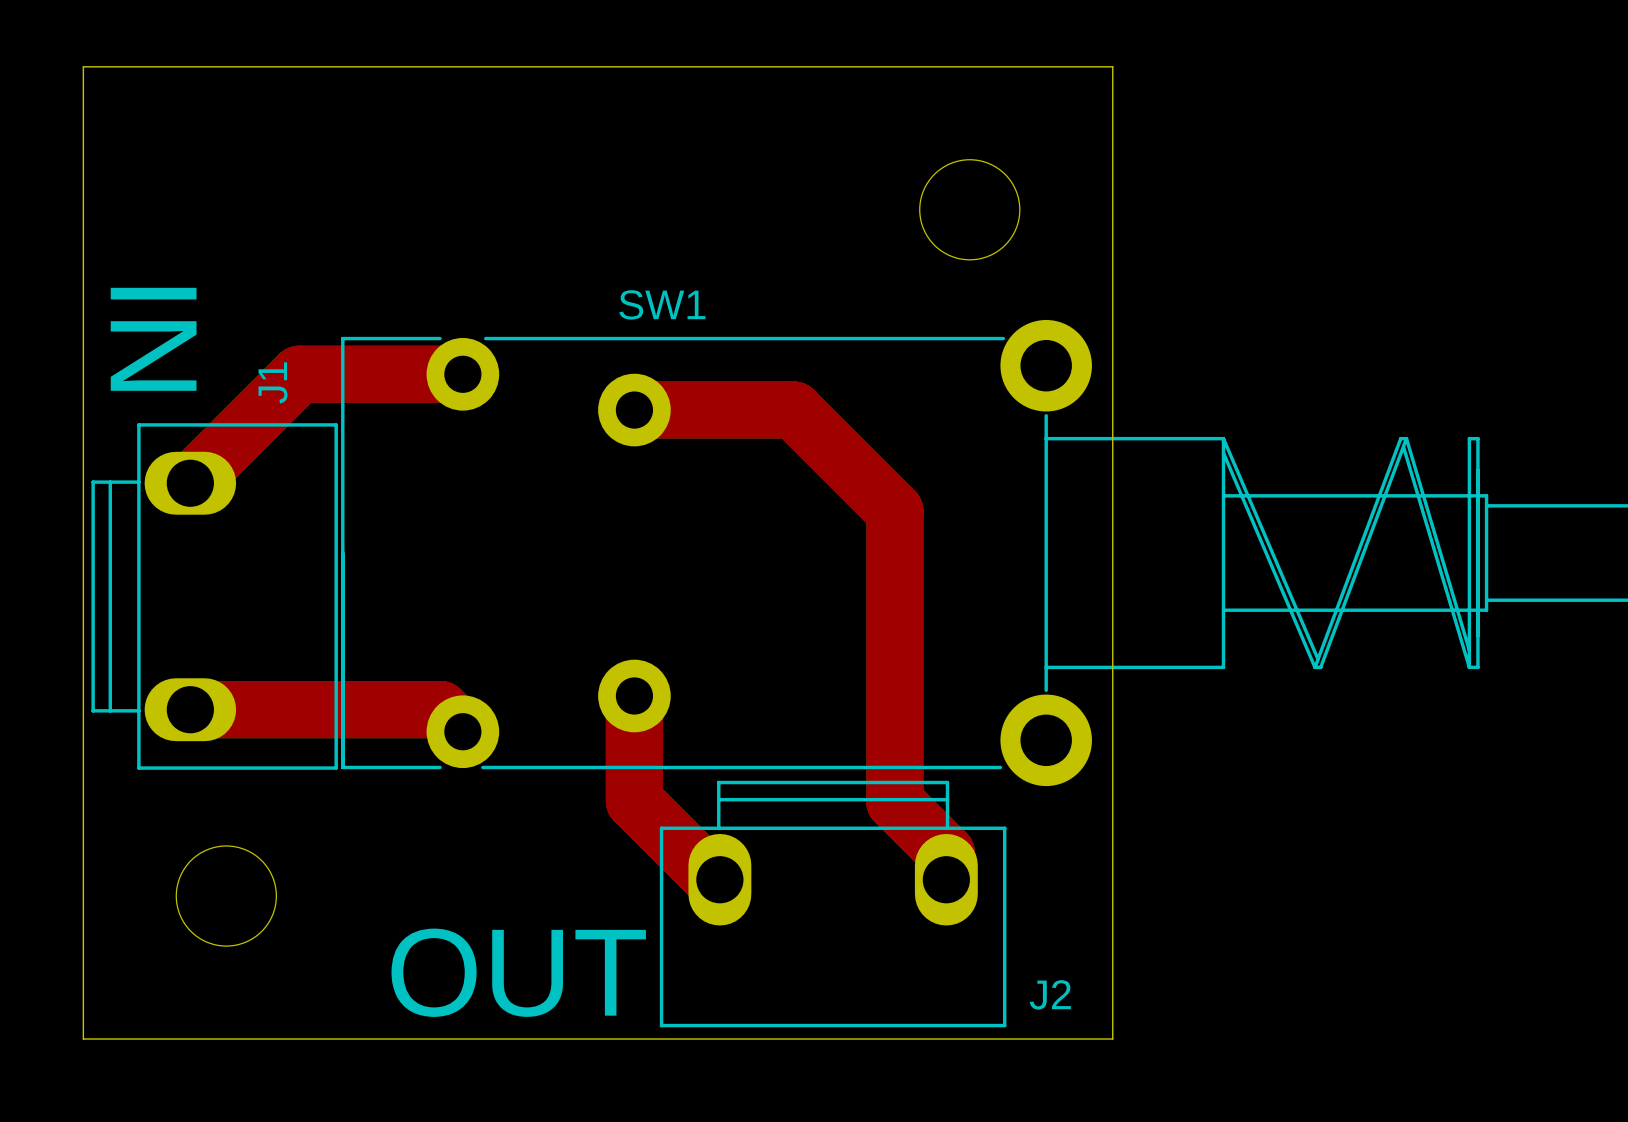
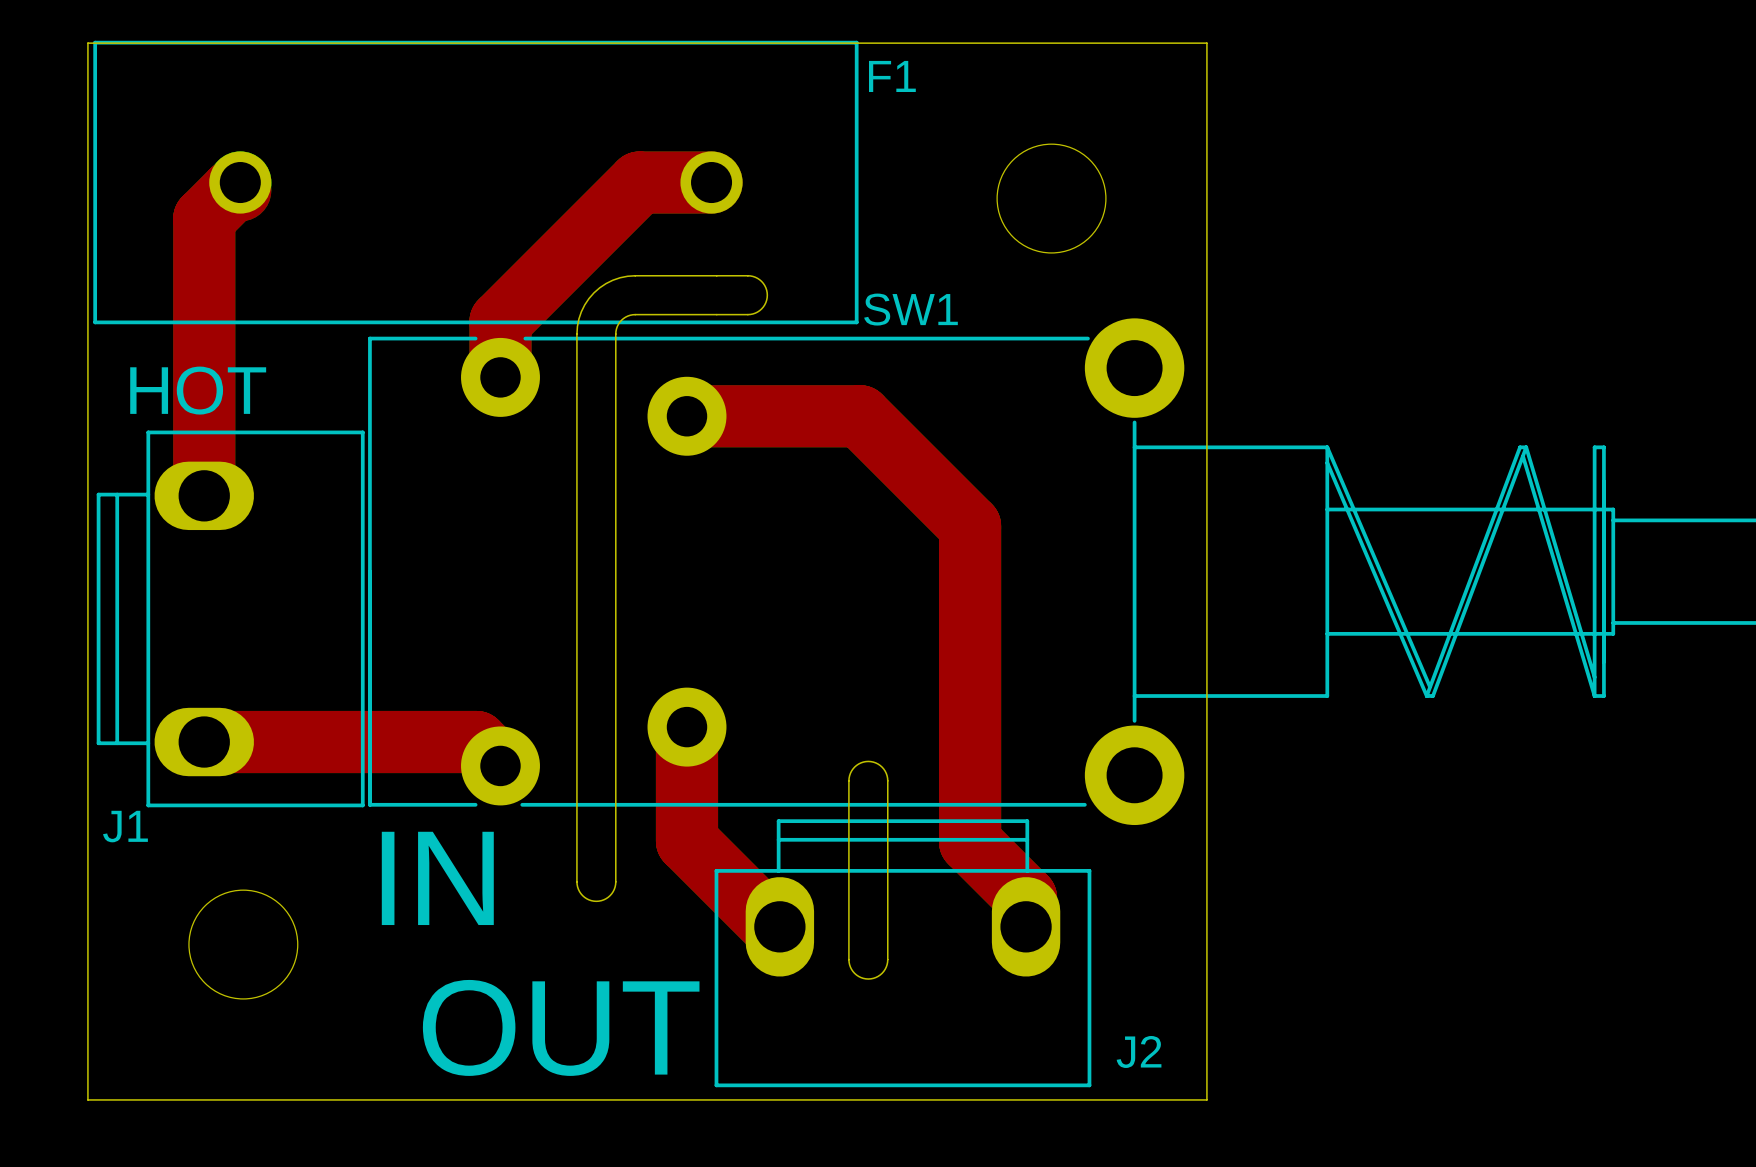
F1: none -> (475, 182)
top track: none -> (711, 182) (639, 182) (500, 321) (500, 377)
board edge: none -> (635, 275) (750, 275) (763, 283) (767, 295) (763, 307) (752, 313) (632, 314) (621, 320) (616, 329) (615, 881) (610, 895) (596, 901) (582, 895) (576, 881) (576, 334) (581, 311) (594, 292) (612, 280) (635, 275)
SW1 name position: SW1 (662, 304) -> SW1 (911, 309)
text rotation: 0° (153, 339) -> 90° counterclockwise (437, 878)
text position: IN (153, 339) -> IN (437, 878)
top track: (462, 374) (299, 374) (190, 483) -> (240, 190) (232, 190) (204, 218) (204, 495)
J1 name rotation: 0° (273, 382) -> 90° clockwise (125, 826)
J1 name position: J1 (273, 382) -> J1 (125, 826)
text: none -> HOT (198, 390)
board edge: none -> (848, 780) (849, 962) (856, 975) (870, 978) (882, 973) (887, 962) (887, 778) (880, 765) (865, 761) (854, 767) (848, 780)

